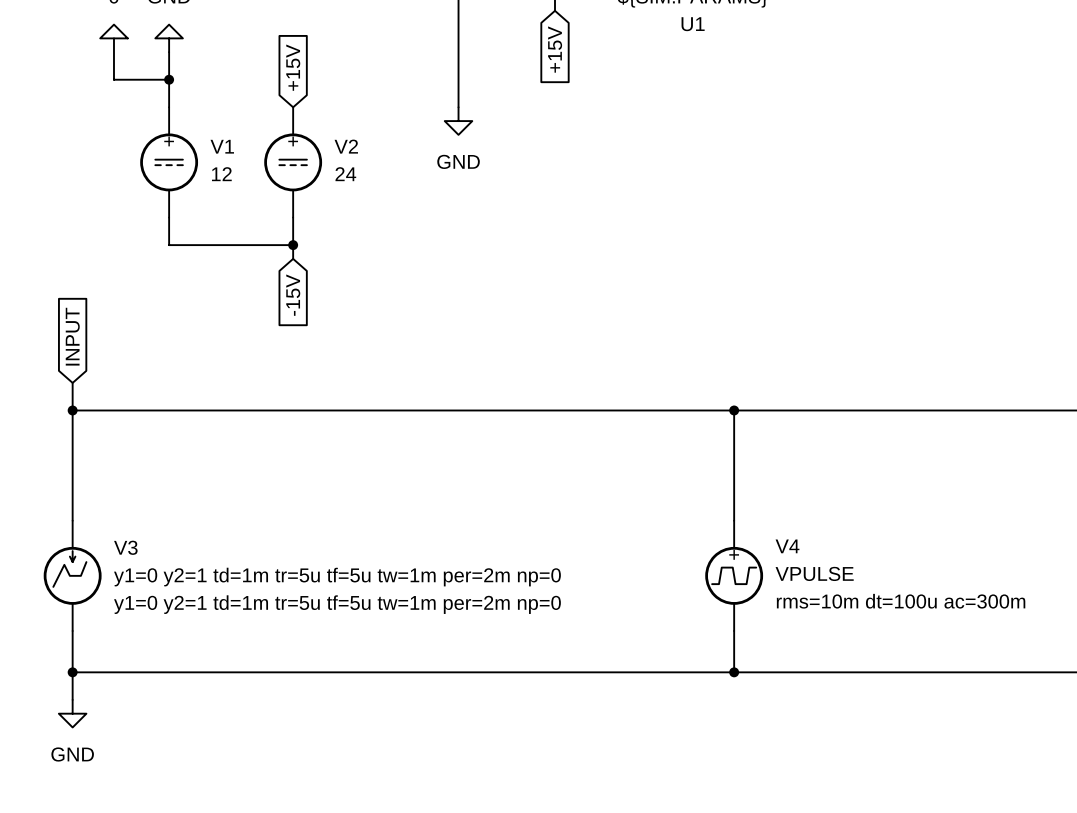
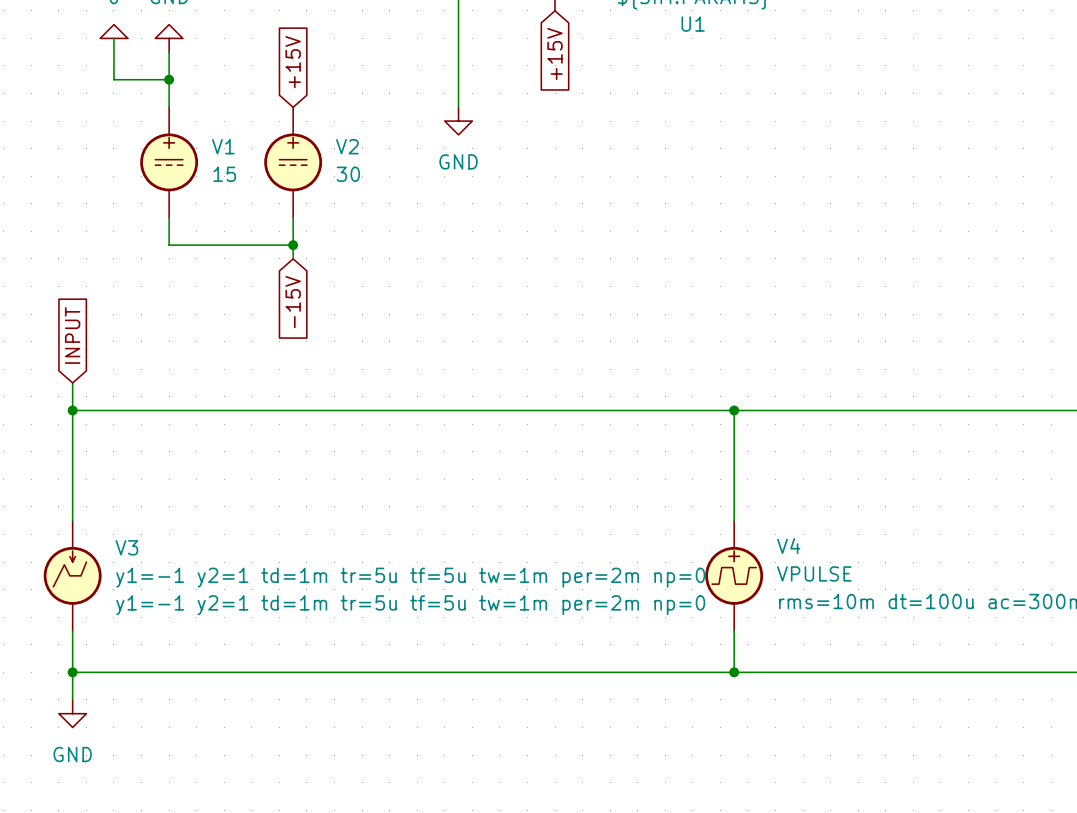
V1 value: 12 (221, 174) -> 15 (224, 174)
V2 value: 24 (345, 174) -> 30 (348, 174)
V3 value: y1=0 y2=1 td=1m tr=5u tf=5u tw=1m per=2m np=0 (337, 577) -> y1=-1 y2=1 td=1m tr=5u tf=5u tw=1m per=2m np=0 (410, 577)
V3 text: y1=0 y2=1 td=1m tr=5u tf=5u tw=1m per=2m np=0 (337, 604) -> y1=-1 y2=1 td=1m tr=5u tf=5u tw=1m per=2m np=0 (410, 605)

